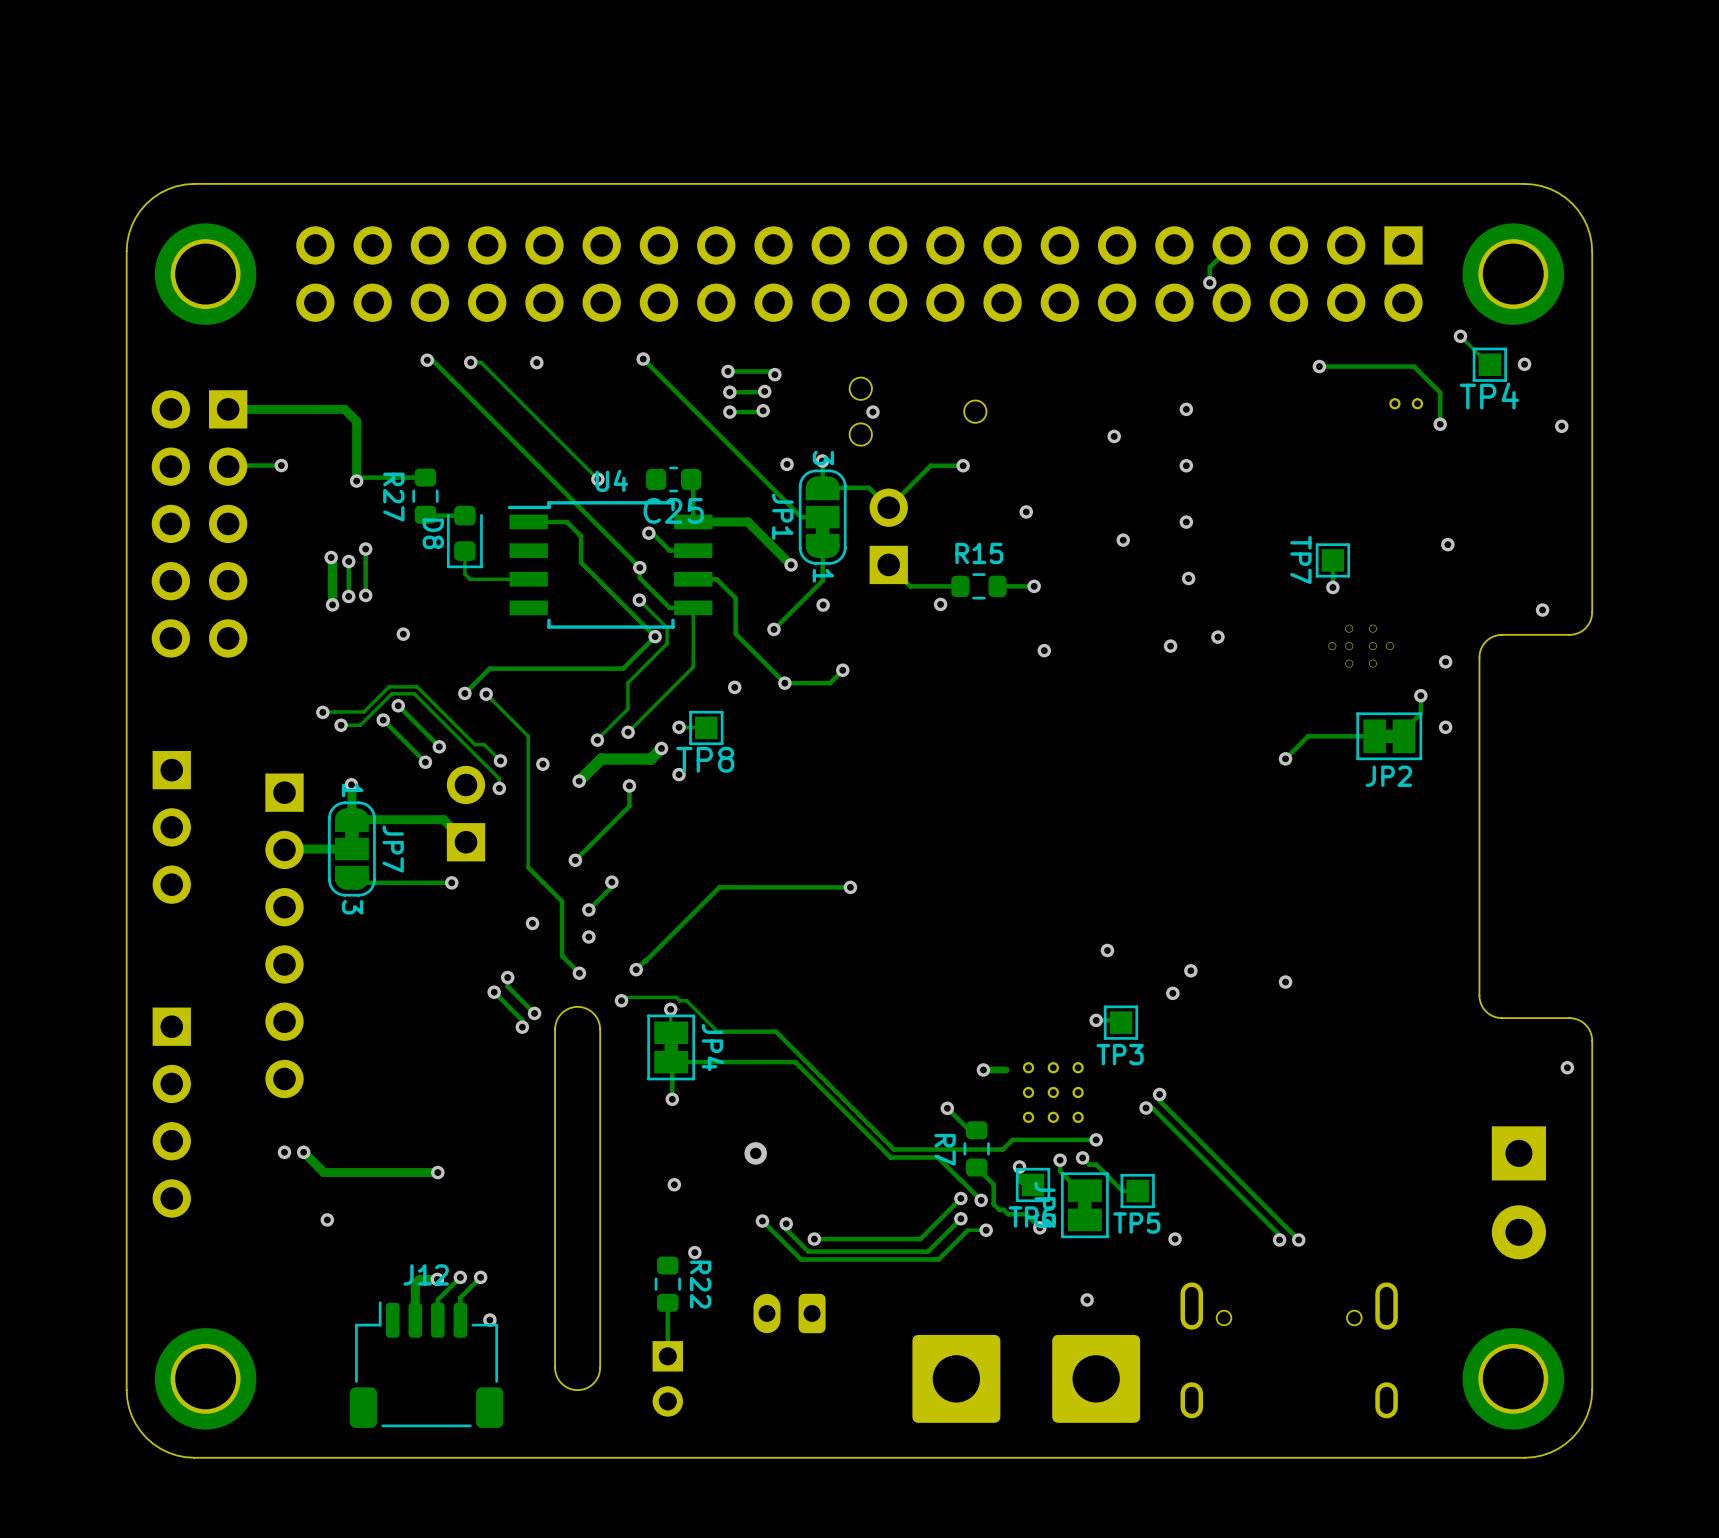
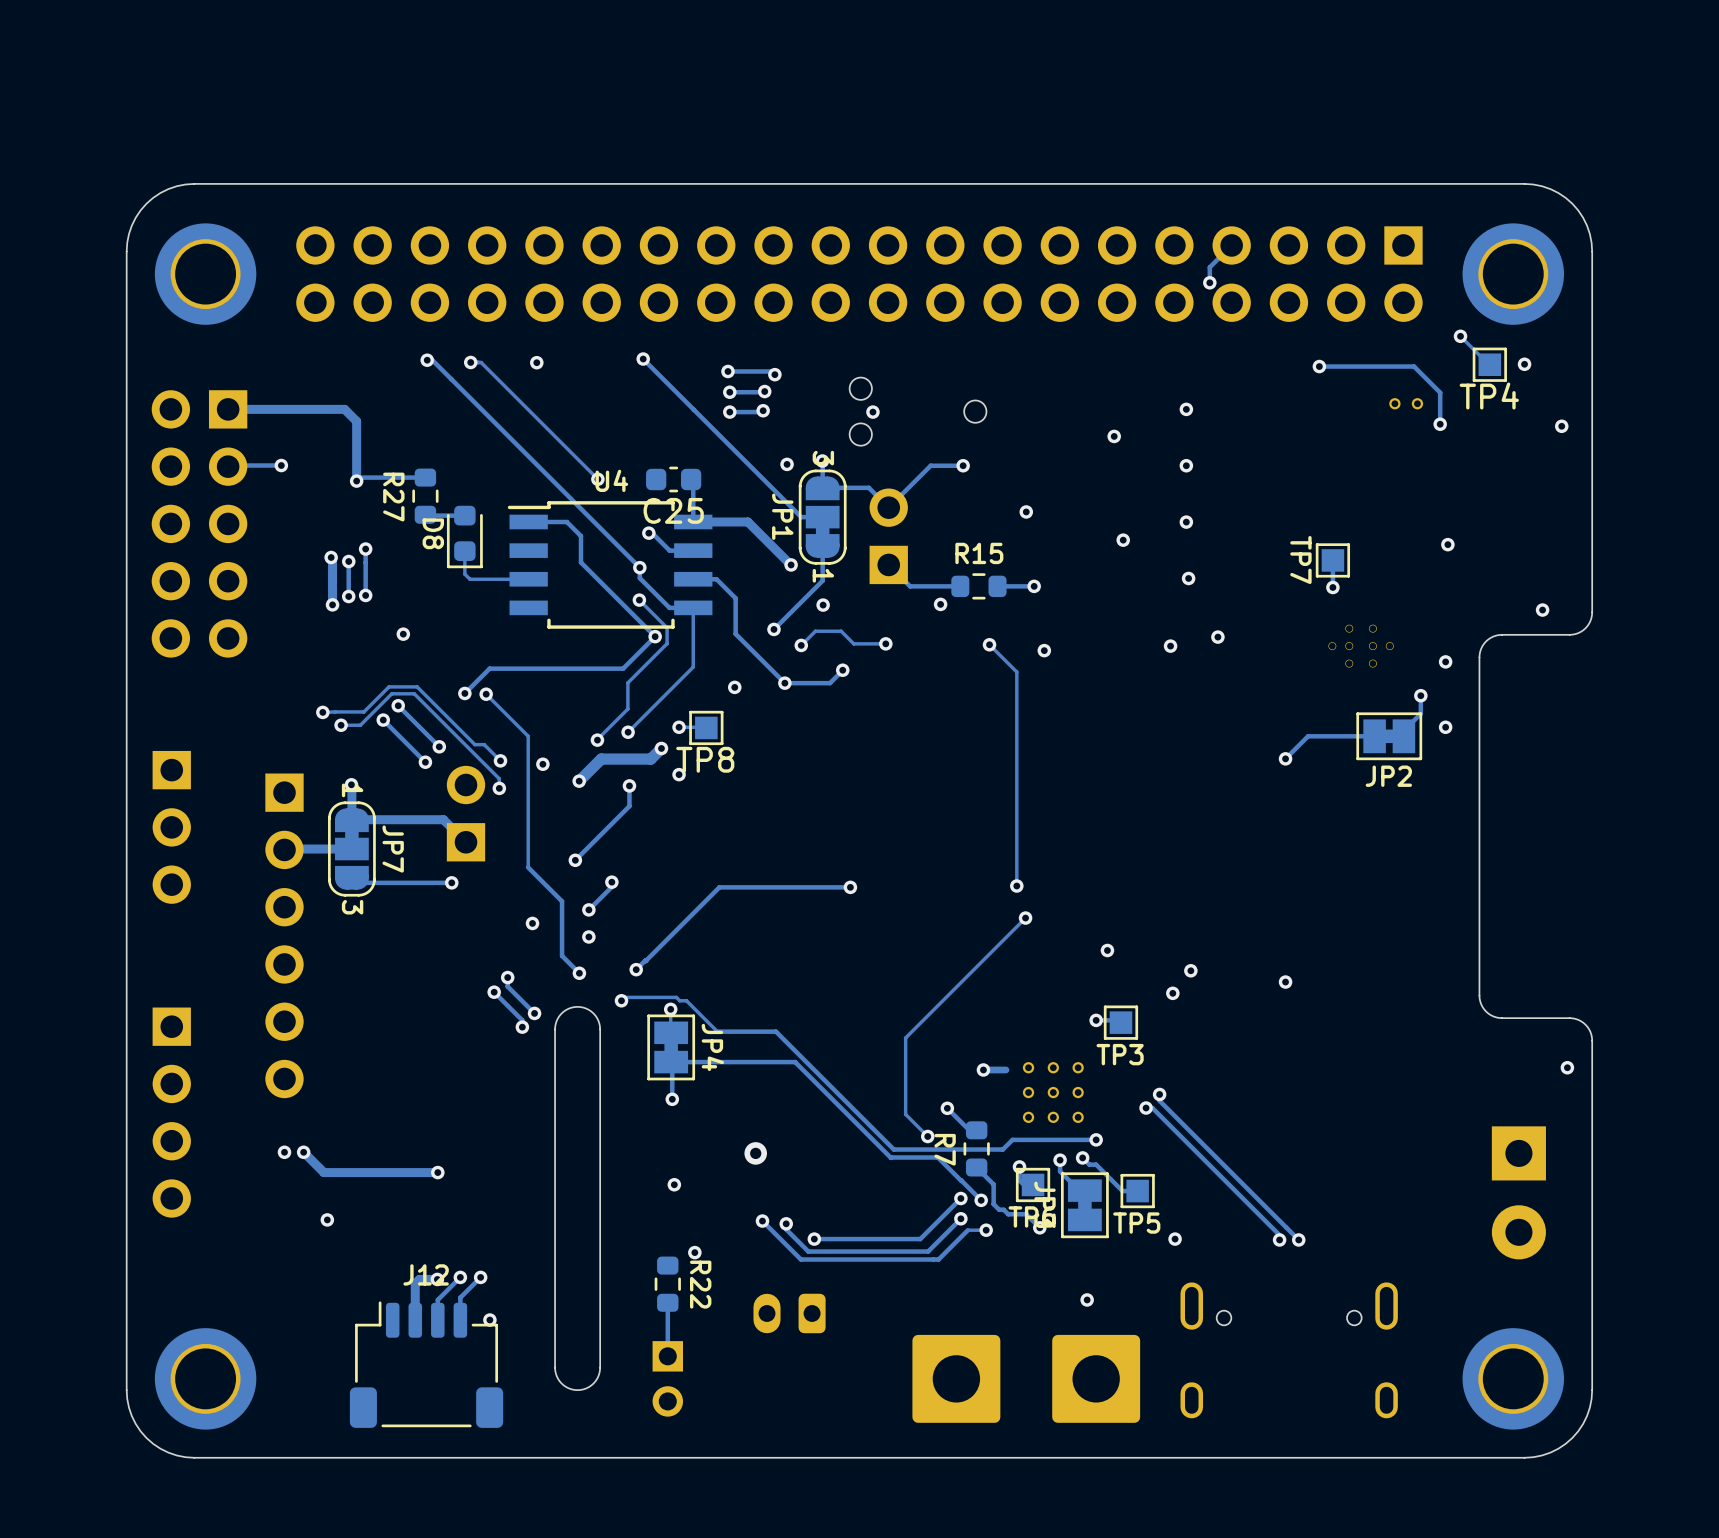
track: none -> (885, 643) (853, 643) (841, 631) (815, 631) (801, 645)
via: none -> (885, 643)
track: none -> (989, 644) (1016, 672) (1016, 886)
via: none -> (989, 644)
via: none -> (801, 645)
via: none -> (1016, 886)
track: none -> (1025, 918) (905, 1037) (905, 1114) (927, 1136)
via: none -> (1025, 918)
via: none -> (927, 1136)

